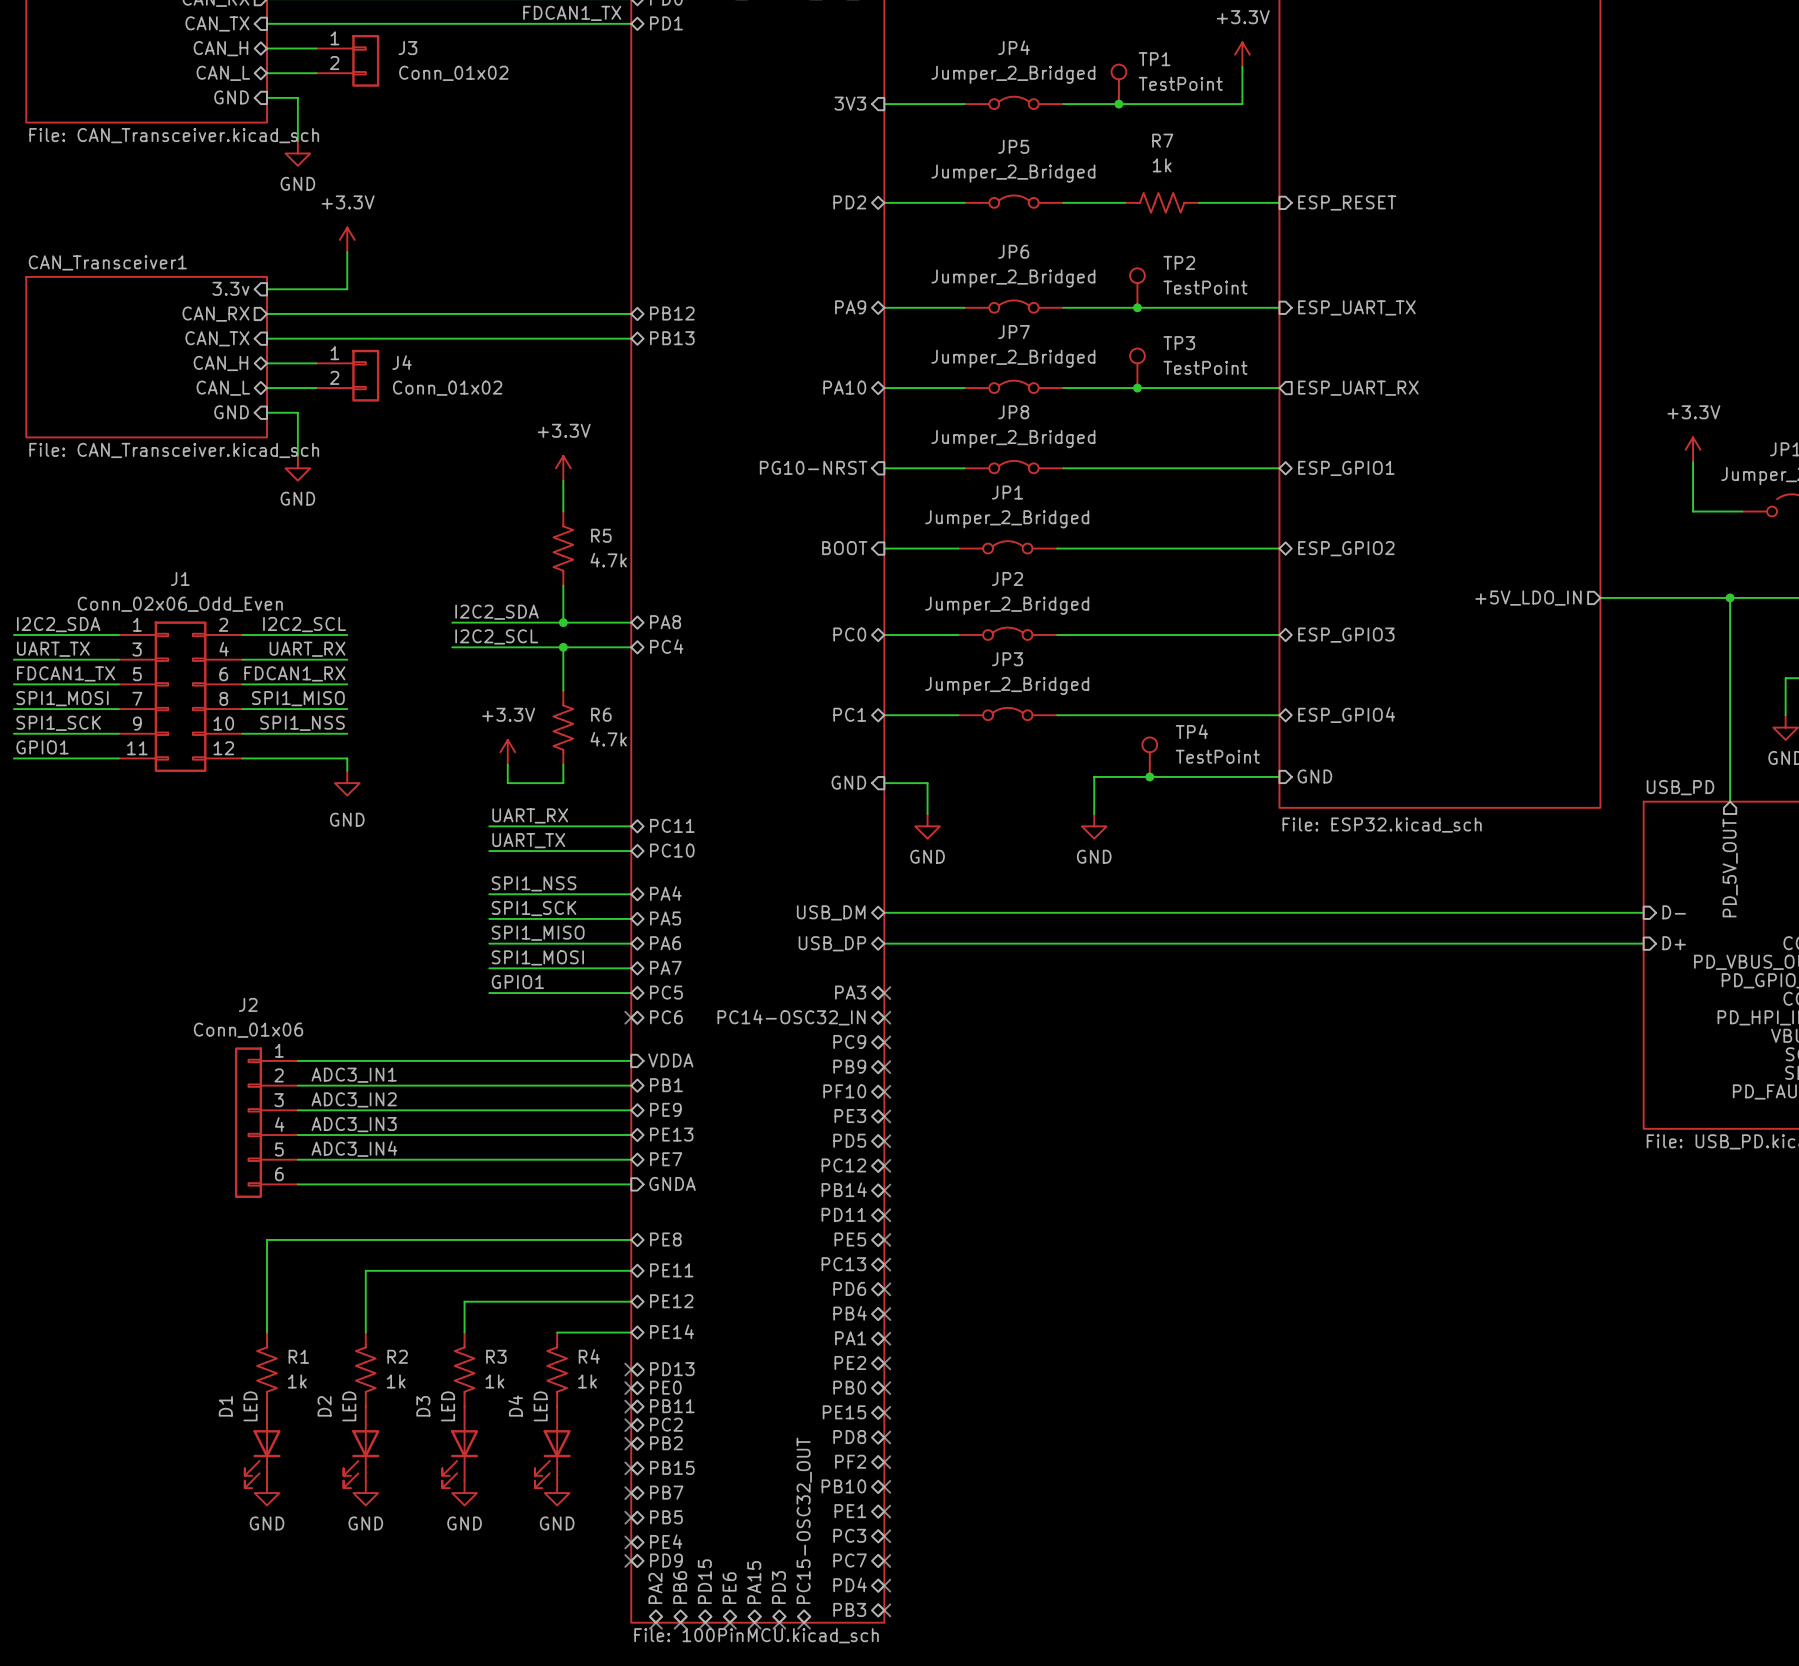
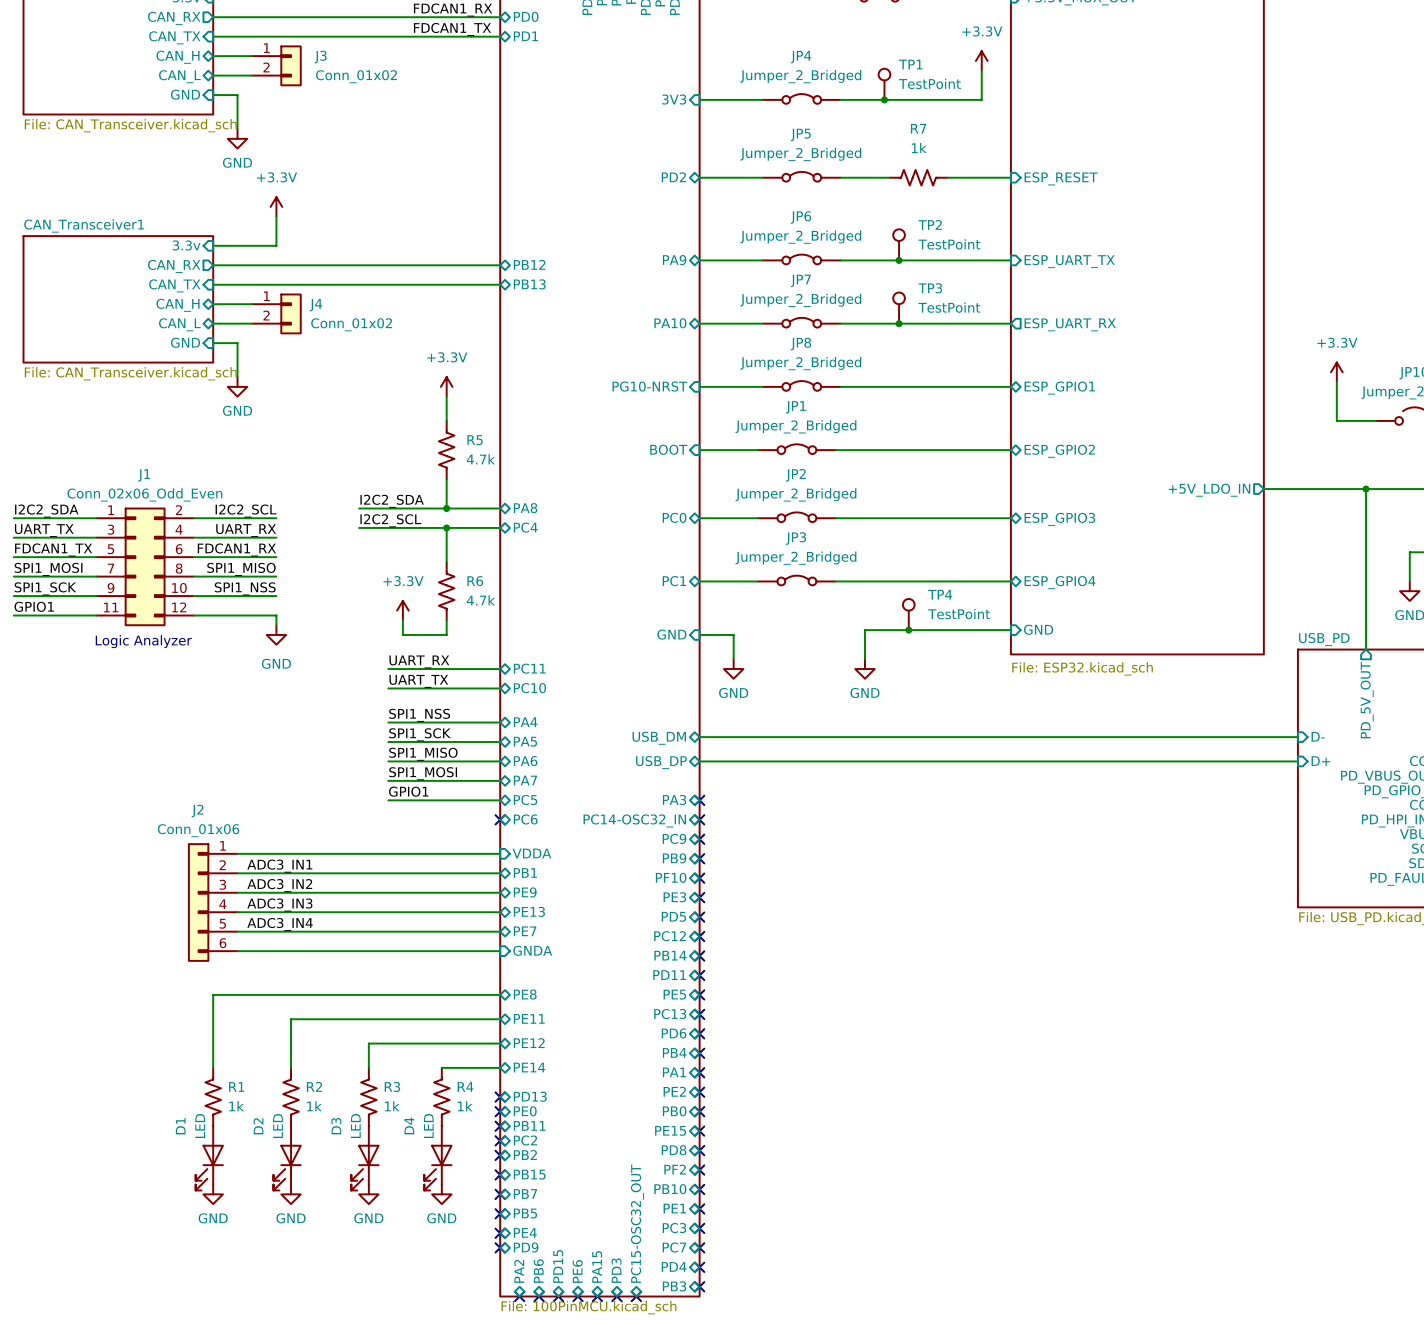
text: none -> Logic Analyzer (143, 641)

